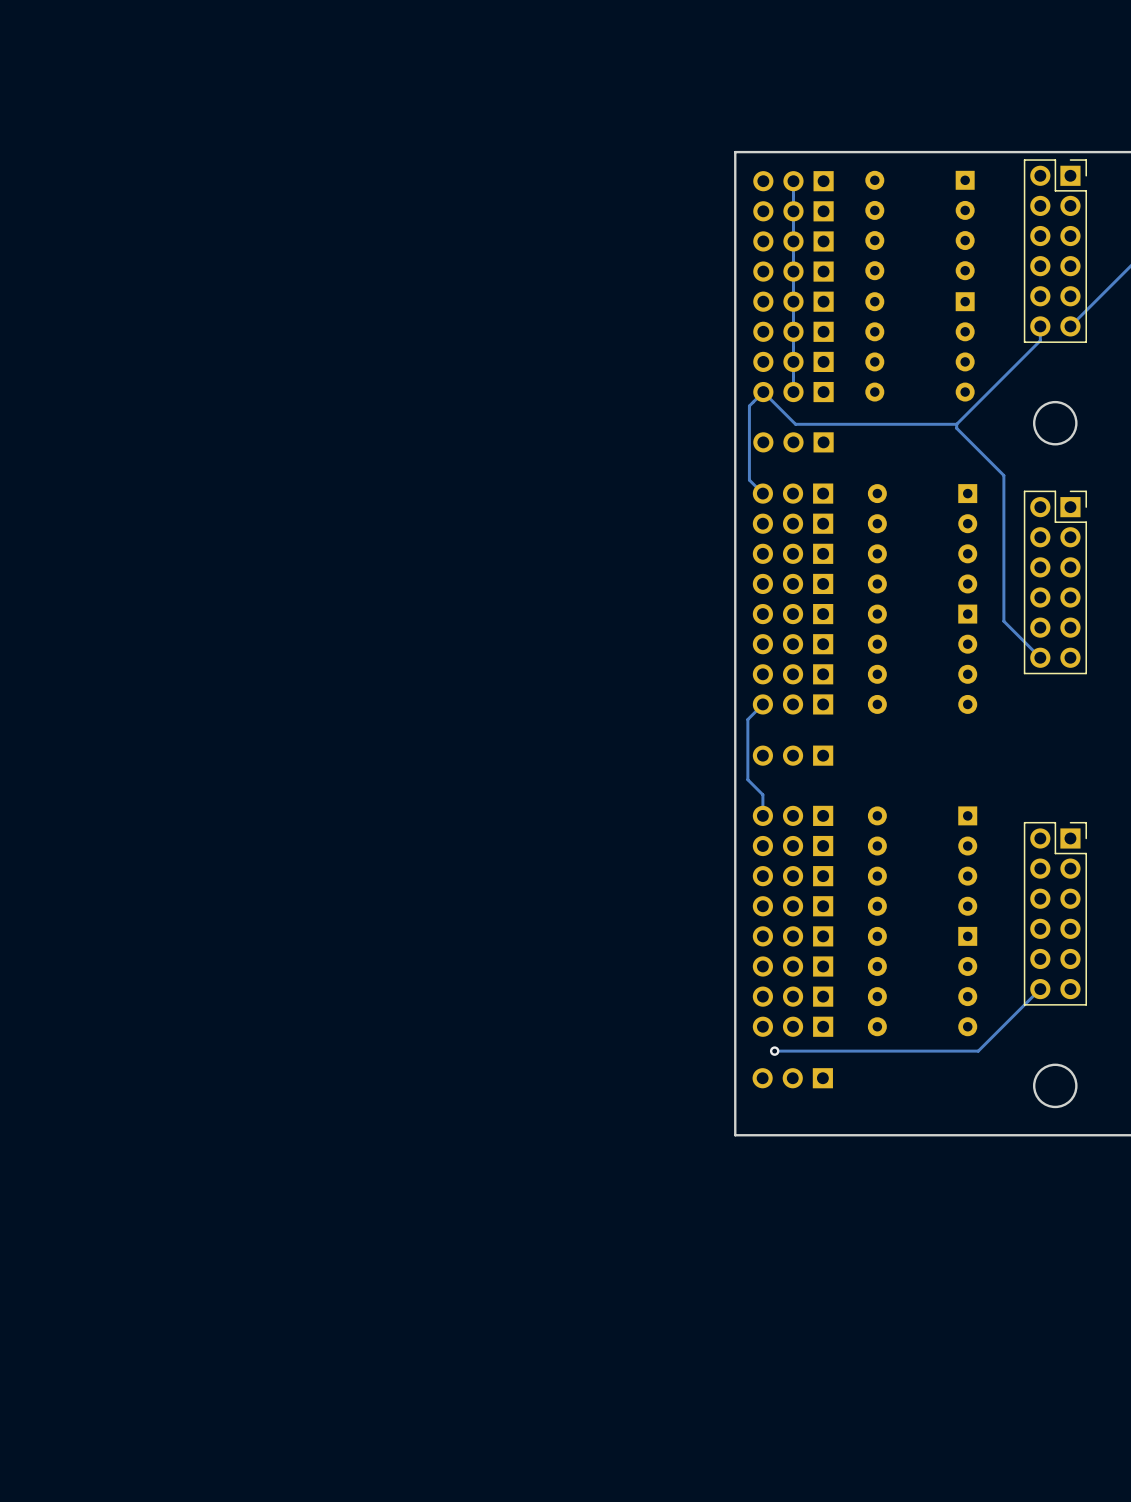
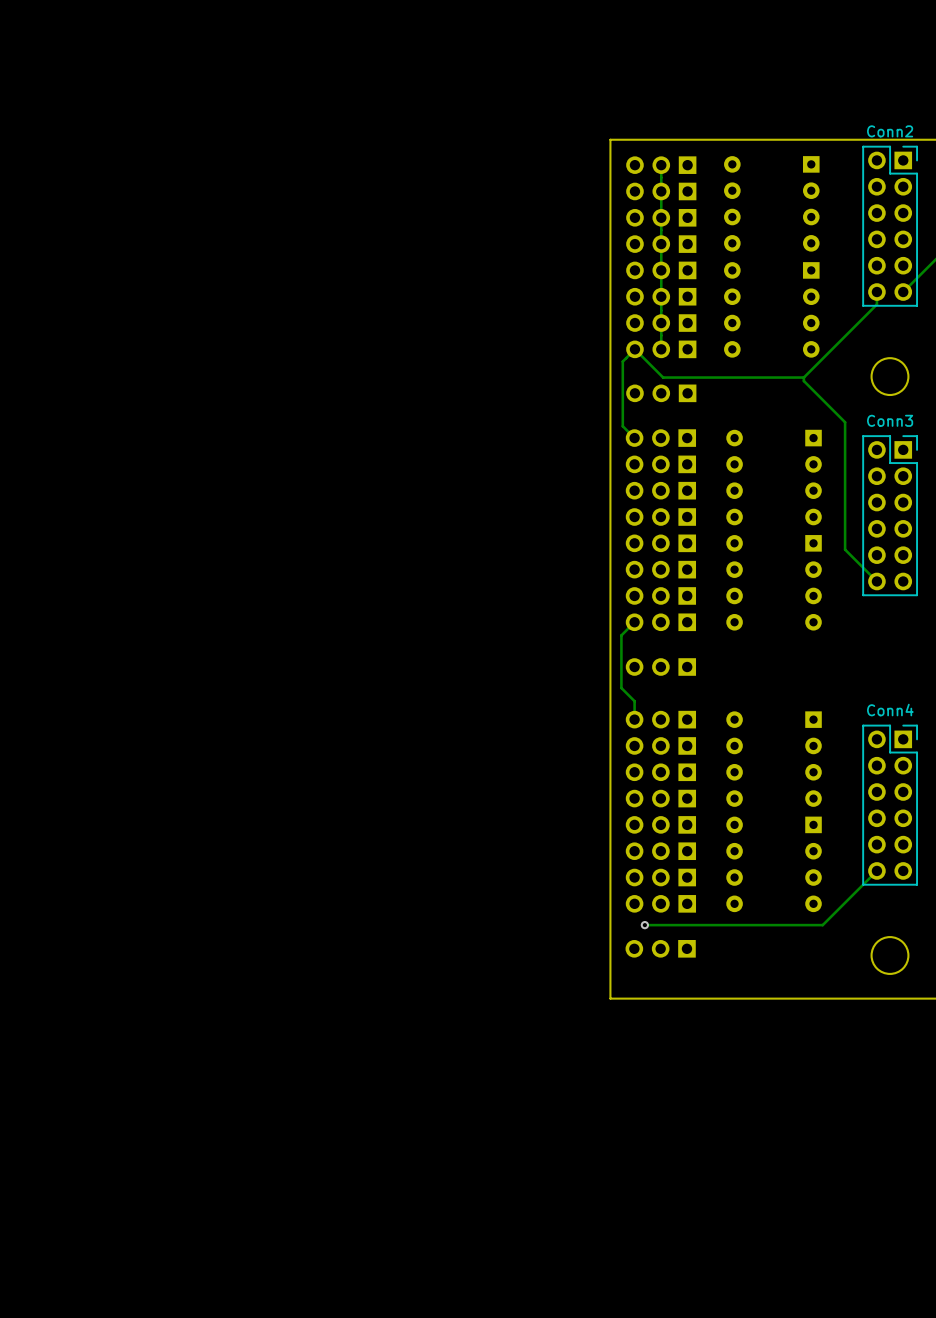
Conn2 name: none -> Conn2 (890, 131)
Conn3 name: none -> Conn3 (890, 420)
Conn4 name: none -> Conn4 (890, 710)

